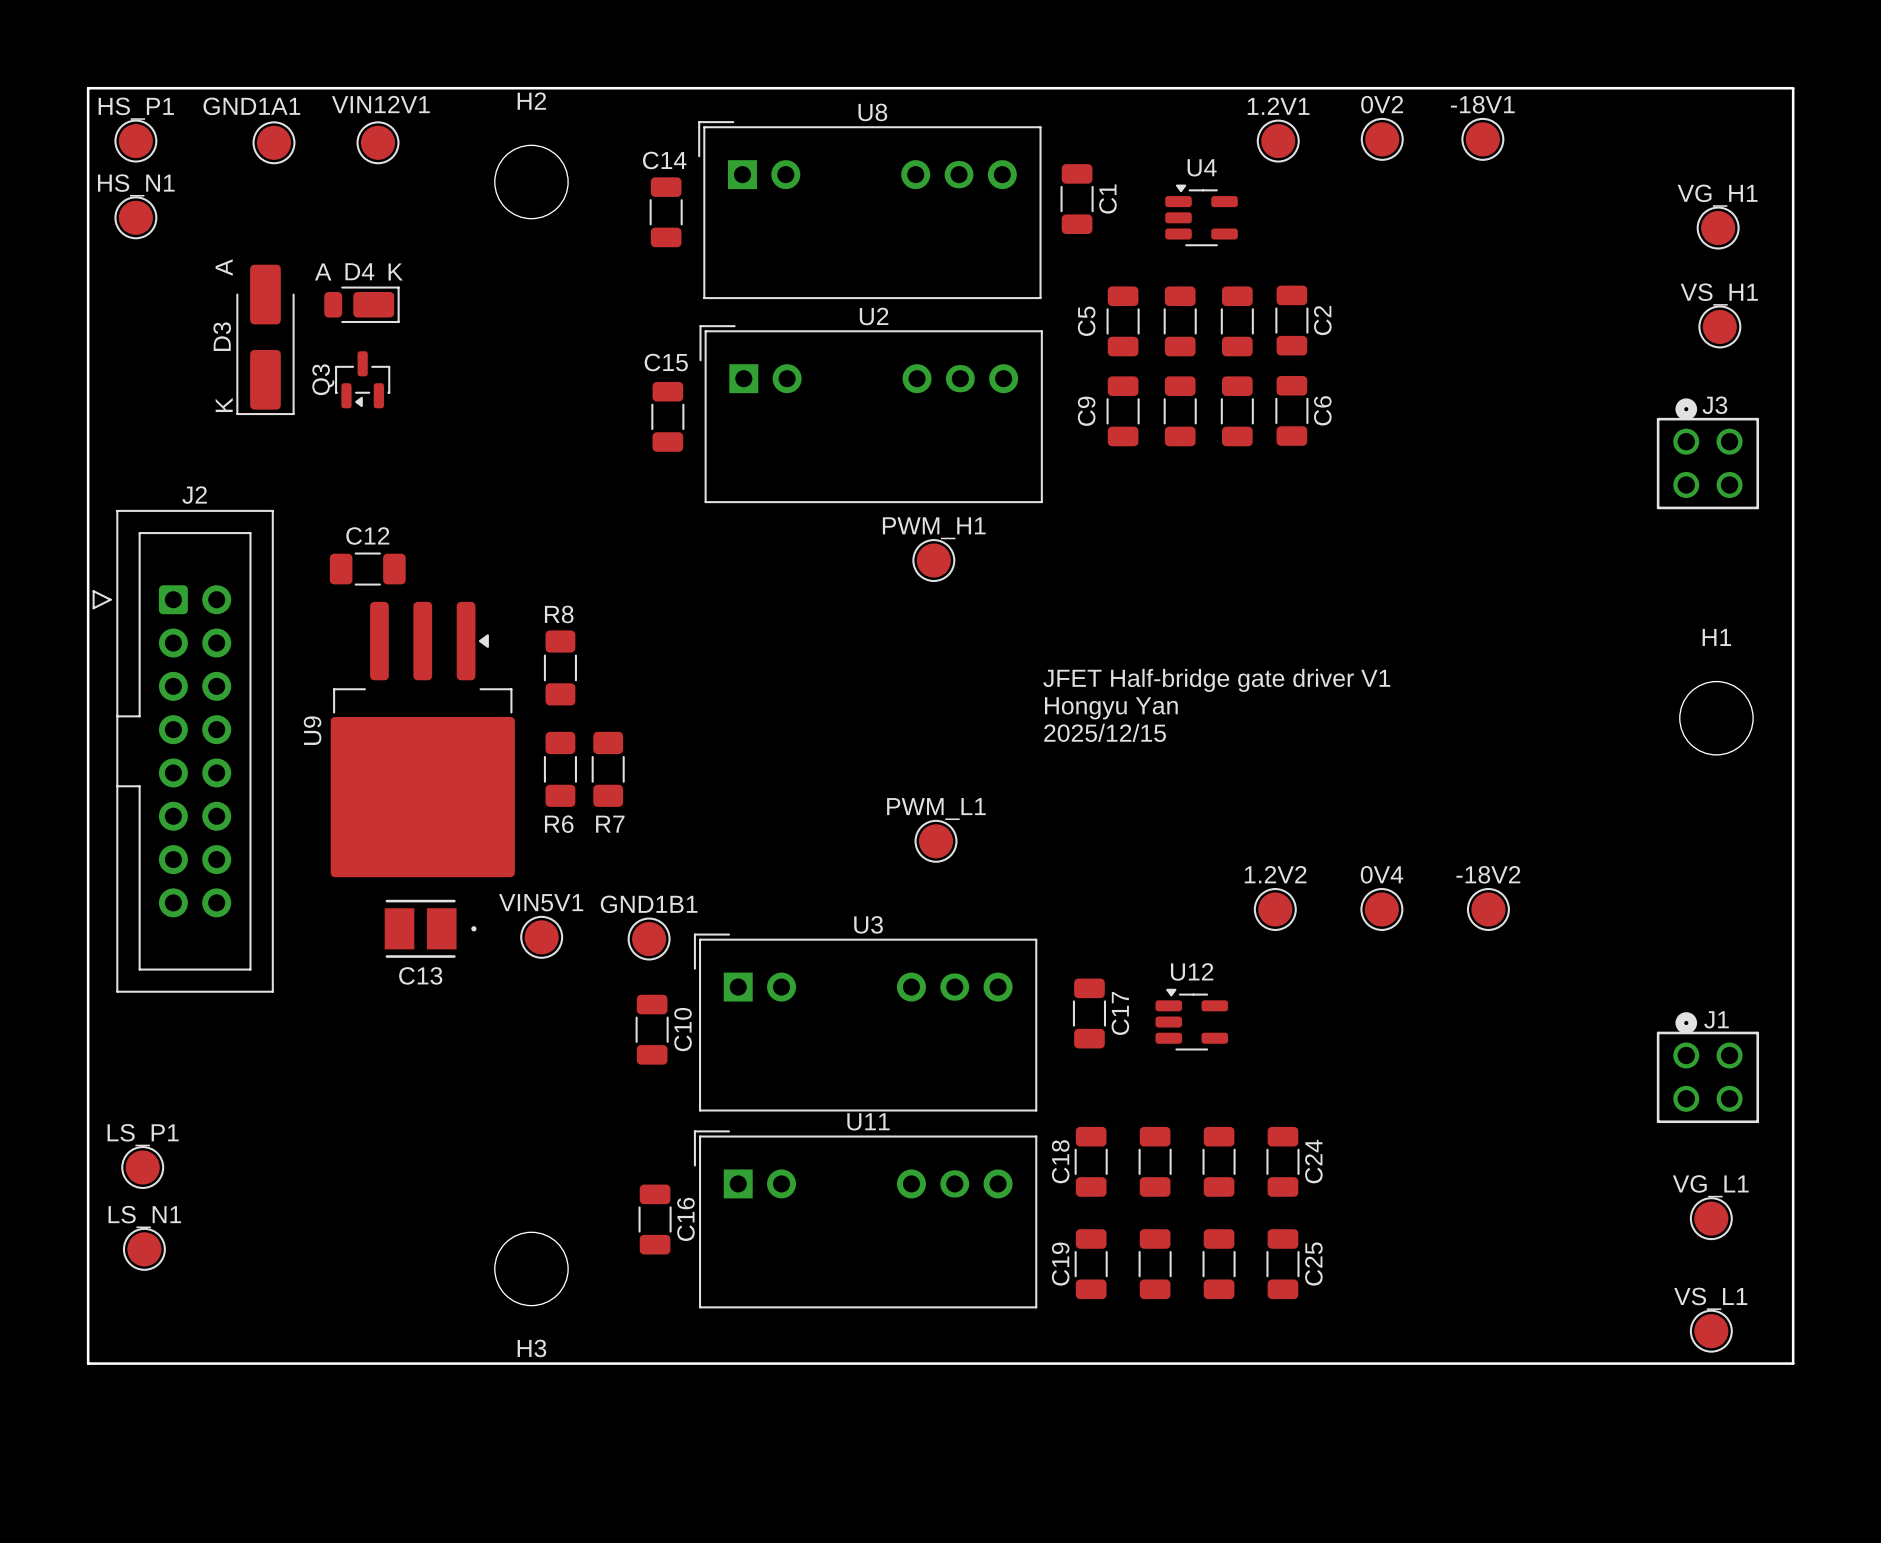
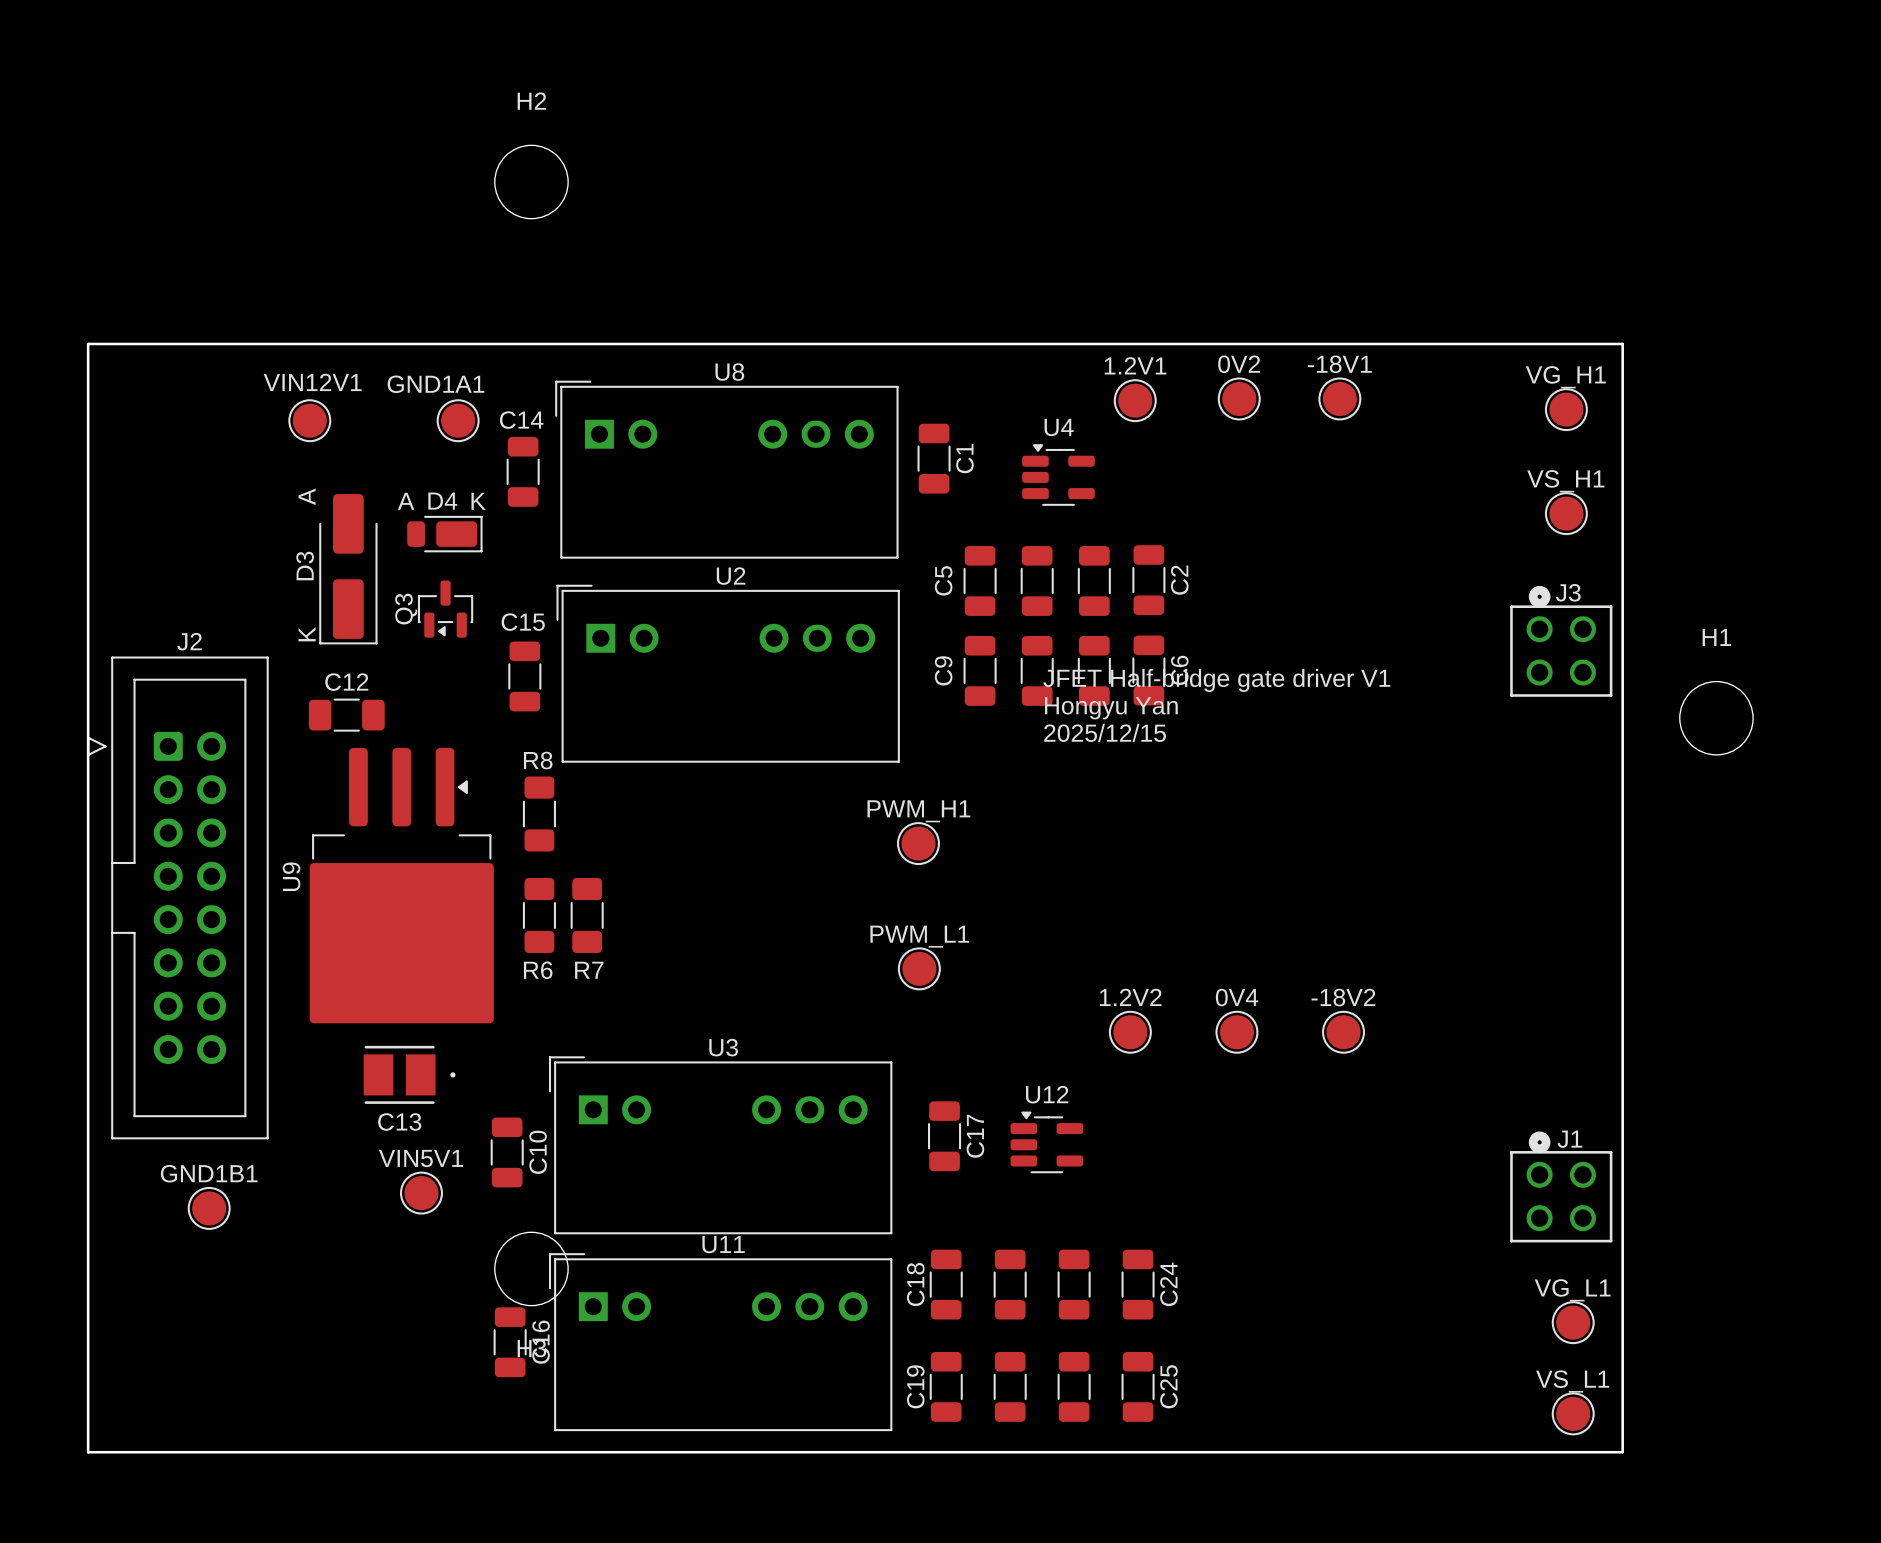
0V2 position: (1382, 139) -> (1239, 398)
-18V1 position: (1482, 139) -> (1339, 398)
HS_P1: (135, 141) -> none
1.2V1 position: (1278, 141) -> (1135, 400)
GND1A1 position: (273, 142) -> (458, 420)
VIN12V1 position: (378, 142) -> (309, 420)
C1 position: (1077, 199) -> (934, 458)
U8 position: (869, 210) -> (726, 469)
C14 position: (666, 212) -> (523, 471)
U4 position: (1201, 215) -> (1058, 475)
HS_N1: (135, 217) -> none
VG_H1 position: (1718, 228) -> (1566, 409)
text: A (224, 267) -> none
text: A (323, 271) -> none
text: K (395, 271) -> none
D4 position: (361, 304) -> (444, 534)
C2 position: (1291, 320) -> (1148, 580)
C5 position: (1123, 321) -> (980, 580)
part: (1180, 321) -> none
part: (1237, 321) -> none
VS_H1 position: (1719, 326) -> (1566, 513)
D3 position: (265, 339) -> (348, 569)
board edge: (88, 343) (88, 88) (1793, 88) (1793, 1363) (88, 1363) -> (88, 343) (1622, 343) (1622, 1452) (88, 1452) (88, 1363)
Q3 position: (362, 379) -> (445, 609)
text: K (224, 404) -> none
C6 position: (1291, 410) -> (1148, 670)
C9 position: (1123, 411) -> (980, 670)
part: (1180, 411) -> none
part: (1237, 411) -> none
U2 position: (871, 414) -> (728, 673)
C15 position: (667, 416) -> (524, 676)
J3 position: (1707, 453) -> (1561, 641)
text: none -> A (307, 496)
text: none -> A (406, 501)
text: none -> K (478, 501)
PWM_H1 position: (933, 560) -> (918, 843)
C12 position: (367, 569) -> (346, 715)
part: none -> (1037, 580)
part: none -> (1094, 580)
text: none -> K (307, 634)
R8 position: (560, 667) -> (539, 814)
part: none -> (1037, 670)
part: none -> (1094, 670)
U9 position: (422, 739) -> (401, 885)
J2 position: (183, 751) -> (178, 897)
R6 position: (560, 769) -> (539, 915)
R7 position: (608, 769) -> (587, 915)
PWM_L1 position: (936, 841) -> (919, 968)
1.2V2 position: (1275, 909) -> (1130, 1032)
0V4 position: (1381, 909) -> (1236, 1032)
-18V2 position: (1488, 909) -> (1343, 1032)
C13 position: (430, 928) -> (409, 1074)
VIN5V1 position: (541, 937) -> (421, 1193)
GND1B1 position: (649, 939) -> (209, 1208)
C17 position: (1089, 1013) -> (944, 1136)
U12 position: (1191, 1019) -> (1046, 1142)
U3 position: (865, 1022) -> (720, 1145)
C10 position: (652, 1029) -> (507, 1152)
J1 position: (1707, 1067) -> (1561, 1186)
C18 position: (1091, 1161) -> (946, 1284)
part: (1155, 1161) -> none
part: (1219, 1161) -> none
C24 position: (1282, 1161) -> (1138, 1284)
LS_P1: (142, 1167) -> none
VG_L1 position: (1711, 1218) -> (1573, 1322)
C16 position: (655, 1219) -> (510, 1342)
U11 position: (865, 1219) -> (720, 1342)
LS_N1: (144, 1249) -> none
C19 position: (1091, 1264) -> (946, 1386)
part: (1155, 1264) -> none
part: (1219, 1264) -> none
C25 position: (1282, 1264) -> (1138, 1386)
part: none -> (1010, 1284)
part: none -> (1074, 1284)
VS_L1 position: (1711, 1331) -> (1573, 1413)
part: none -> (1010, 1386)
part: none -> (1074, 1386)

